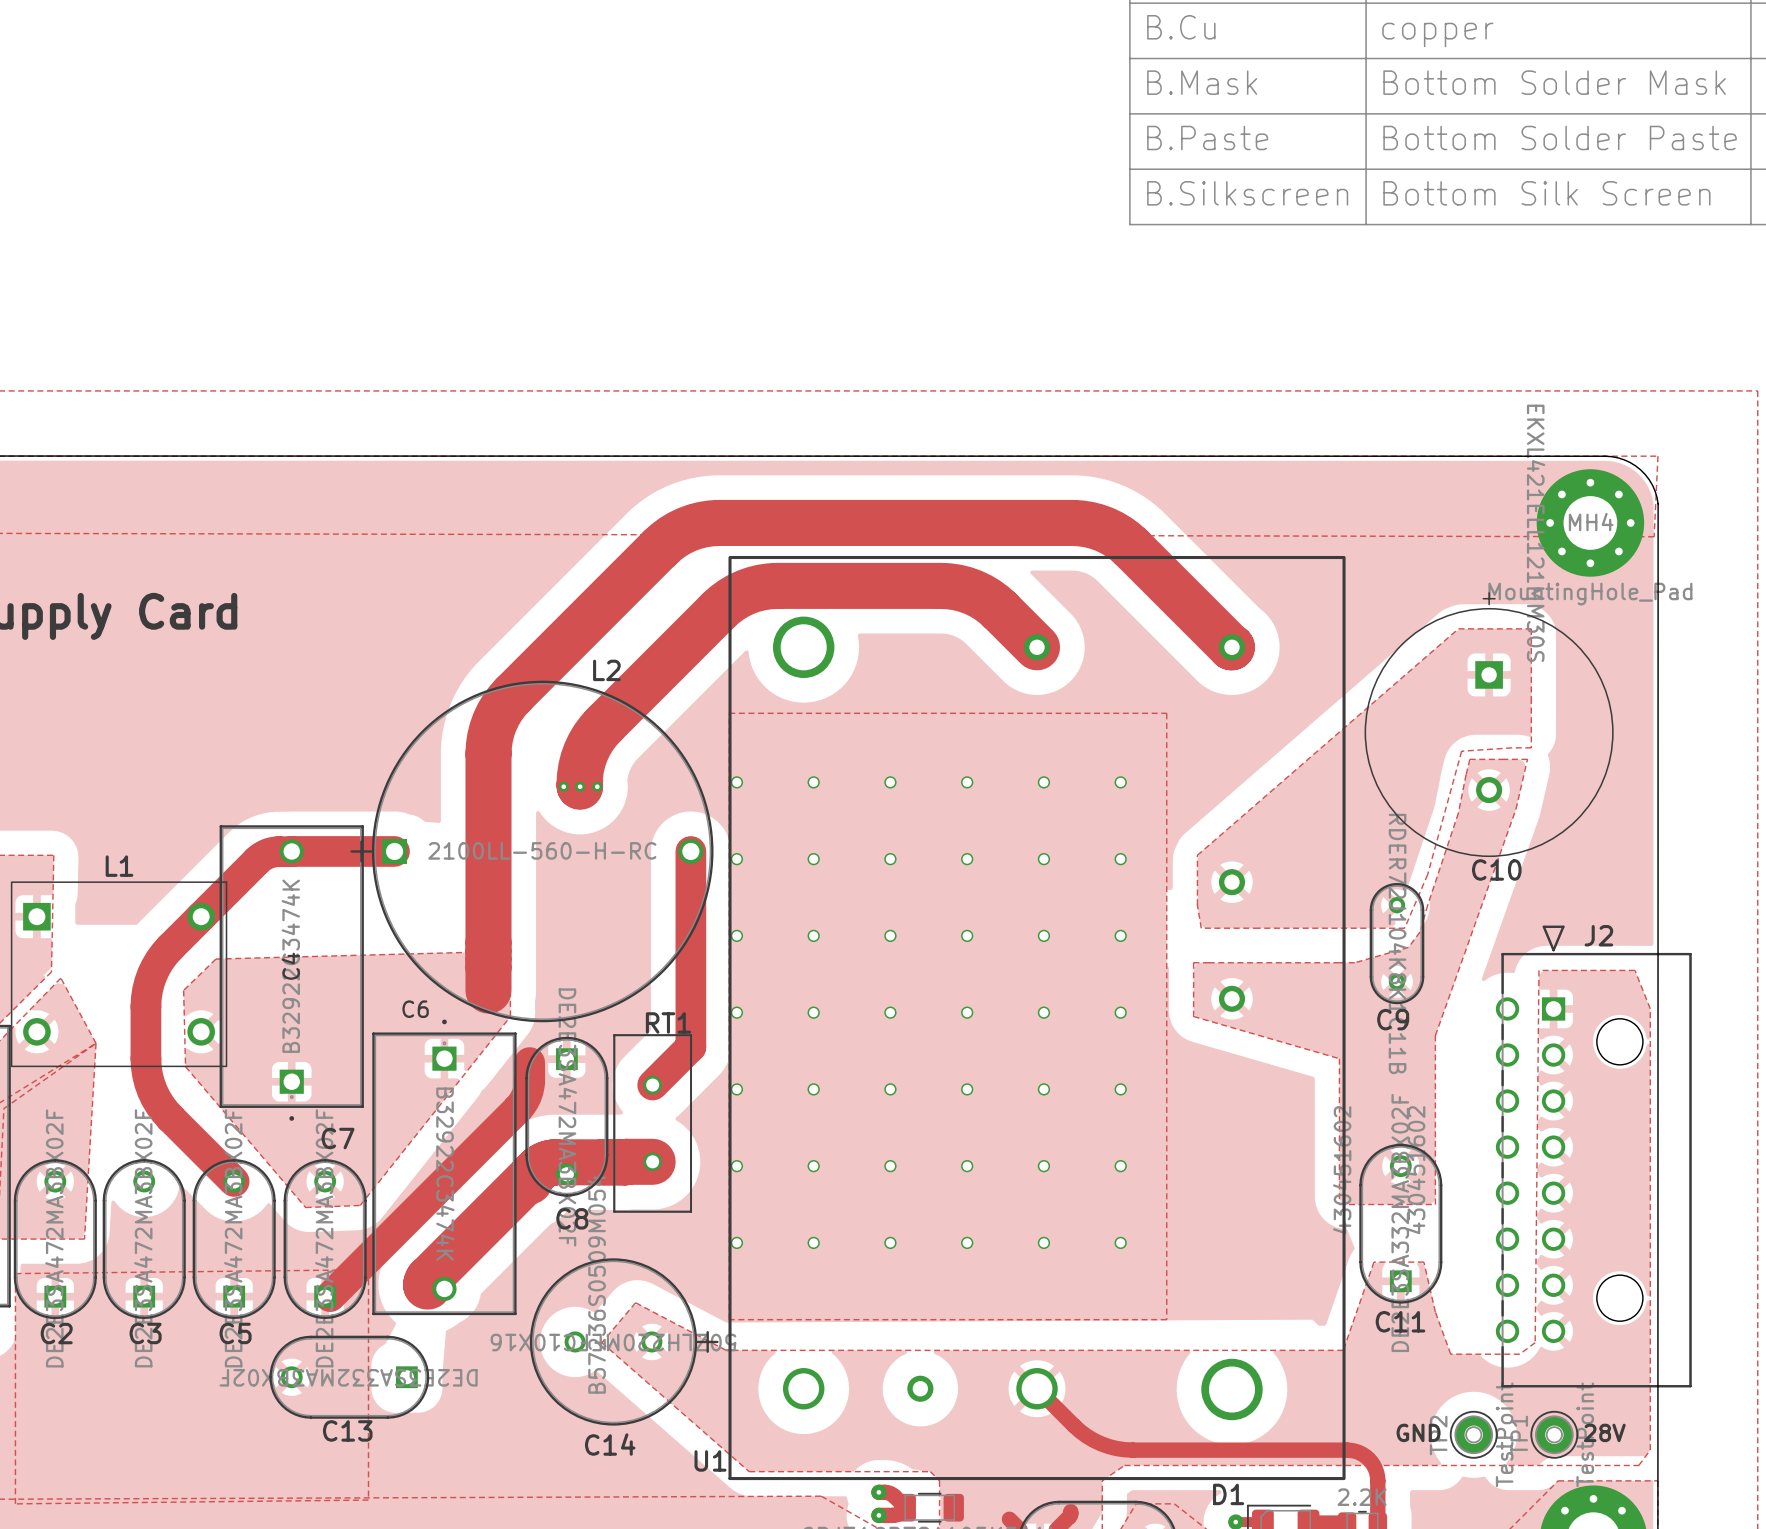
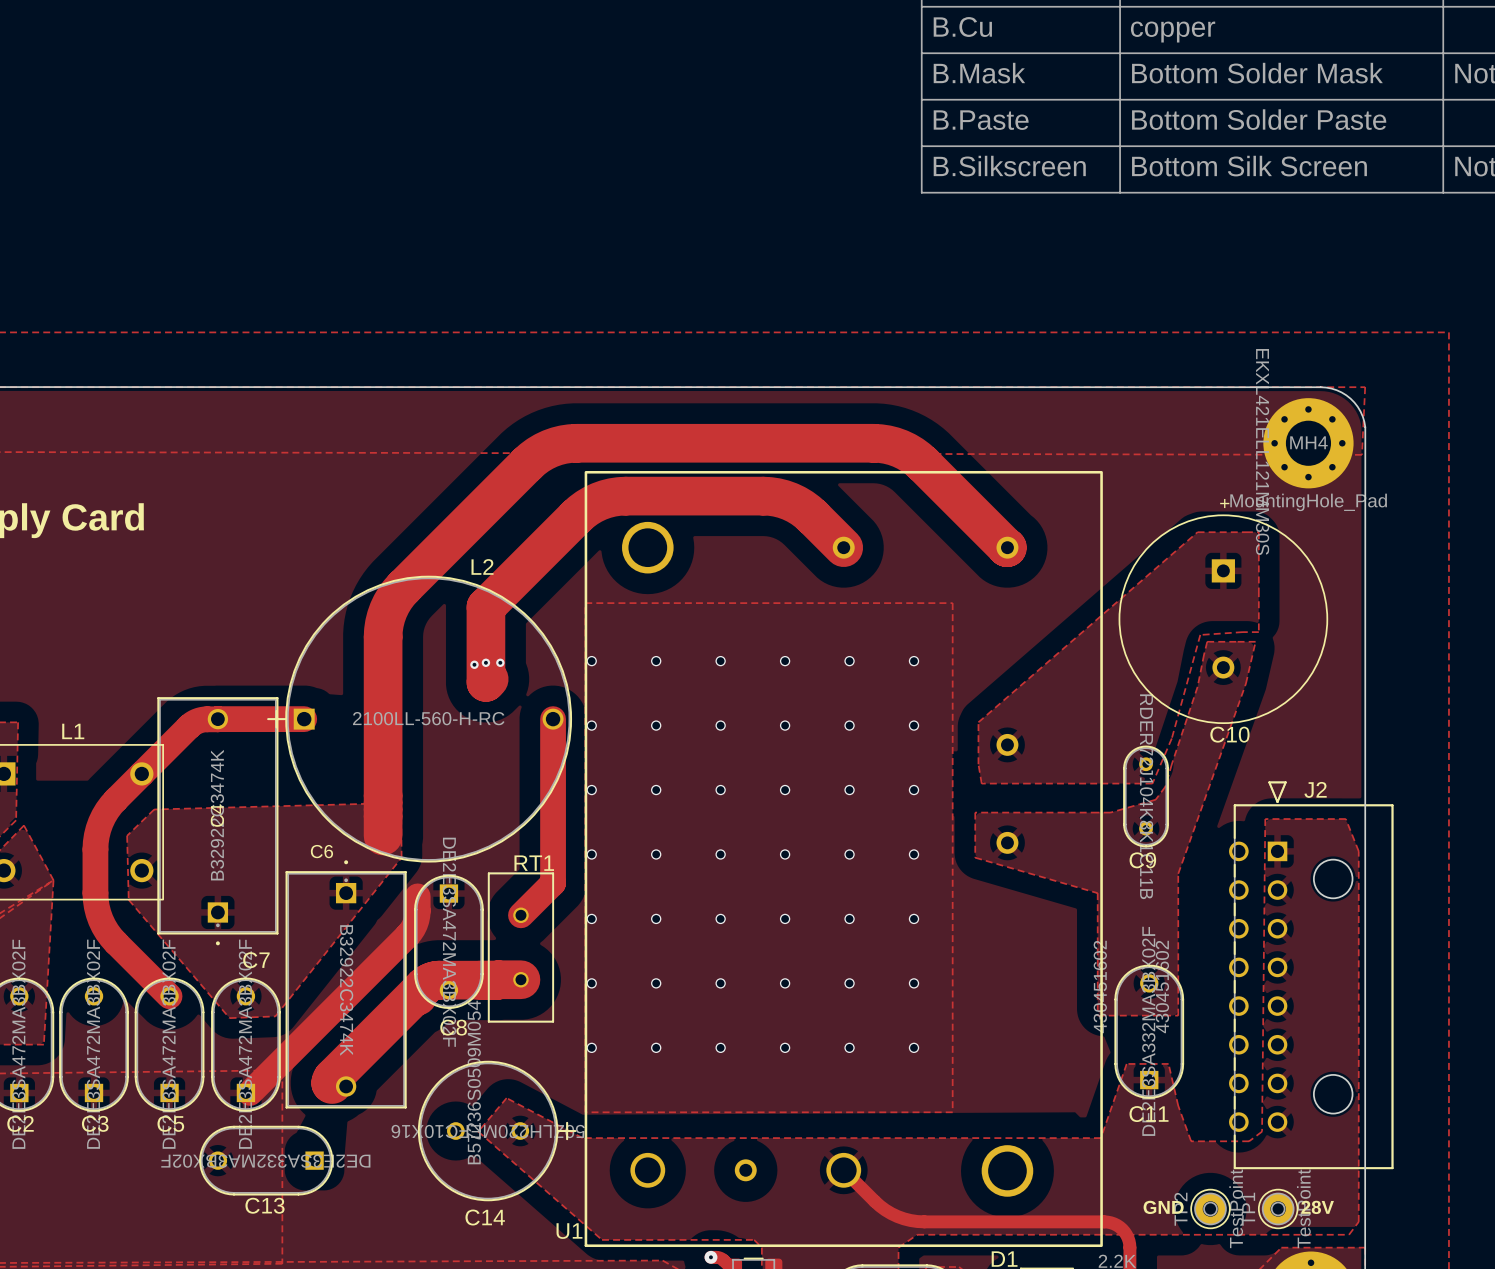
track: (610, 718) (593, 737) (585, 752) (581, 767) (580, 786) -> (485, 607) (485, 682) (489, 679)
via: none -> (485, 662)
via: none -> (500, 662)
via: (563, 786) -> none
via: (580, 786) -> none

